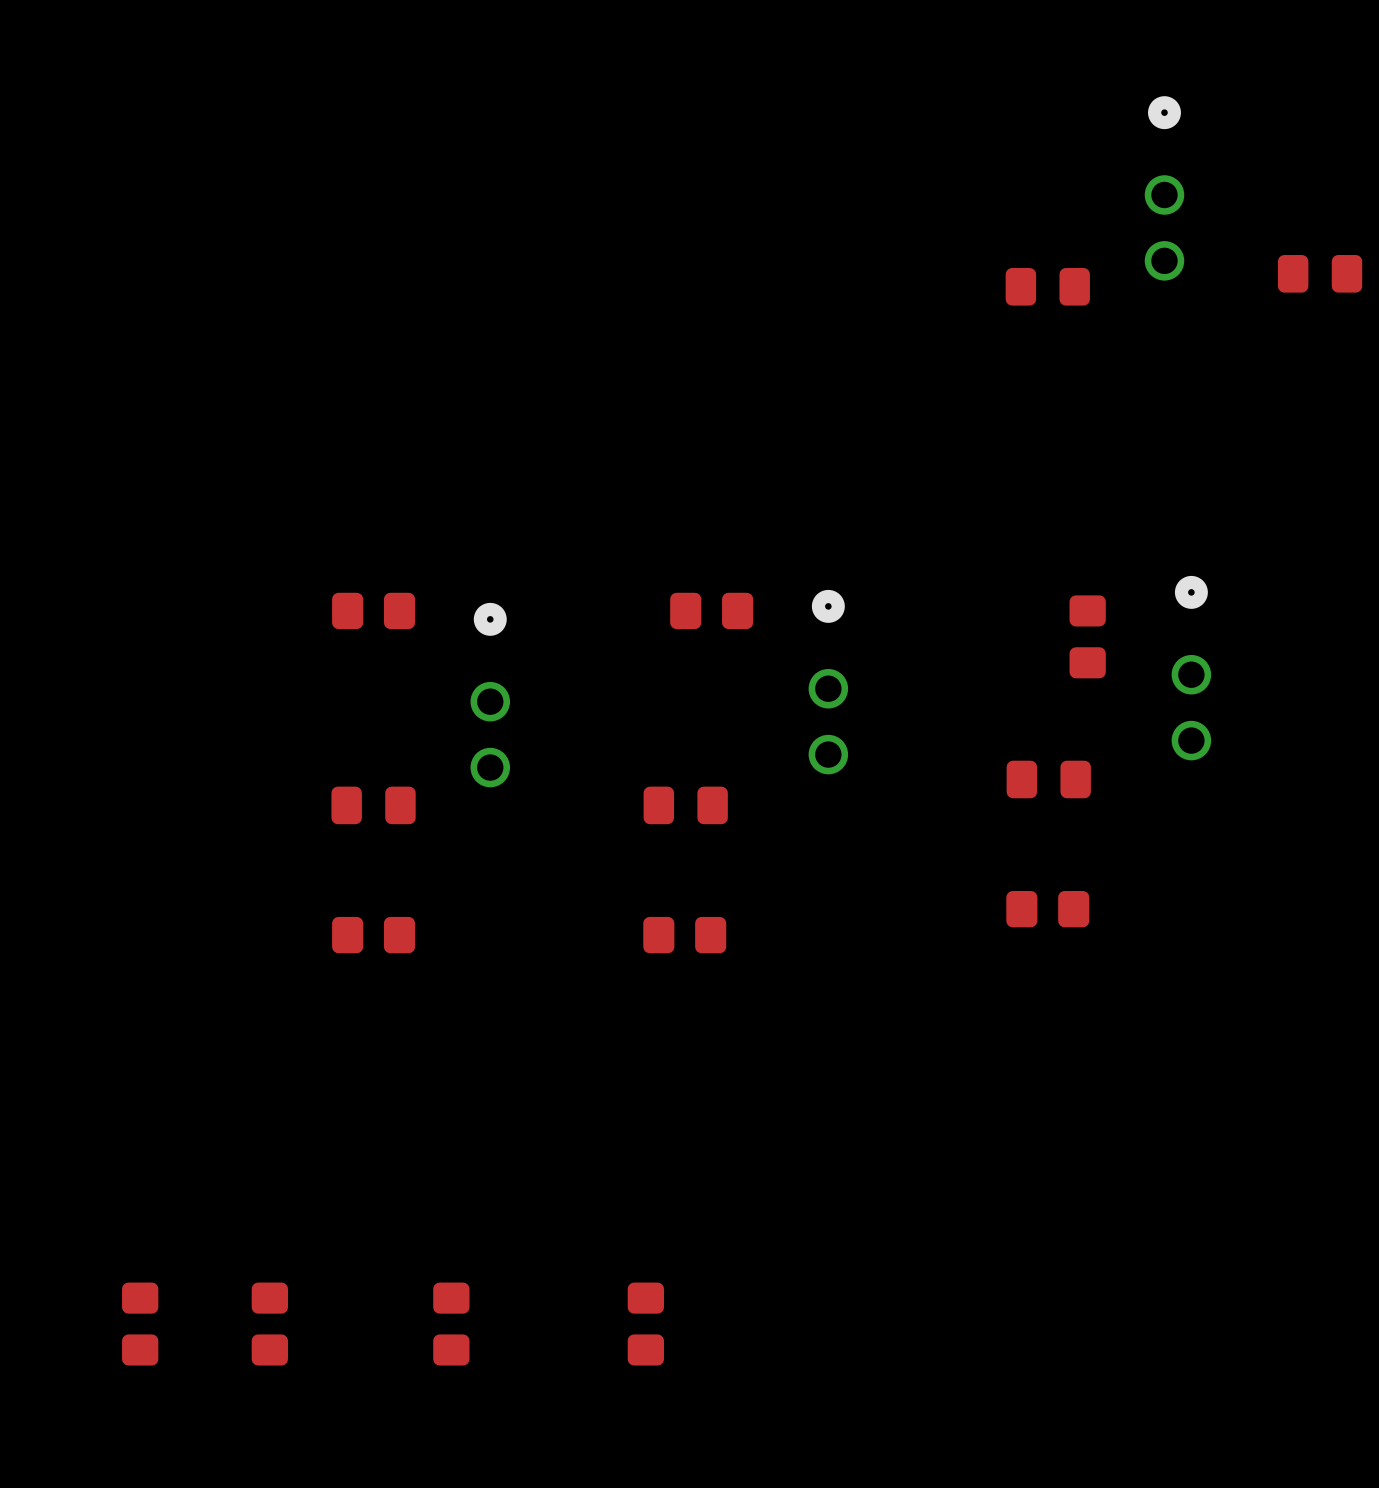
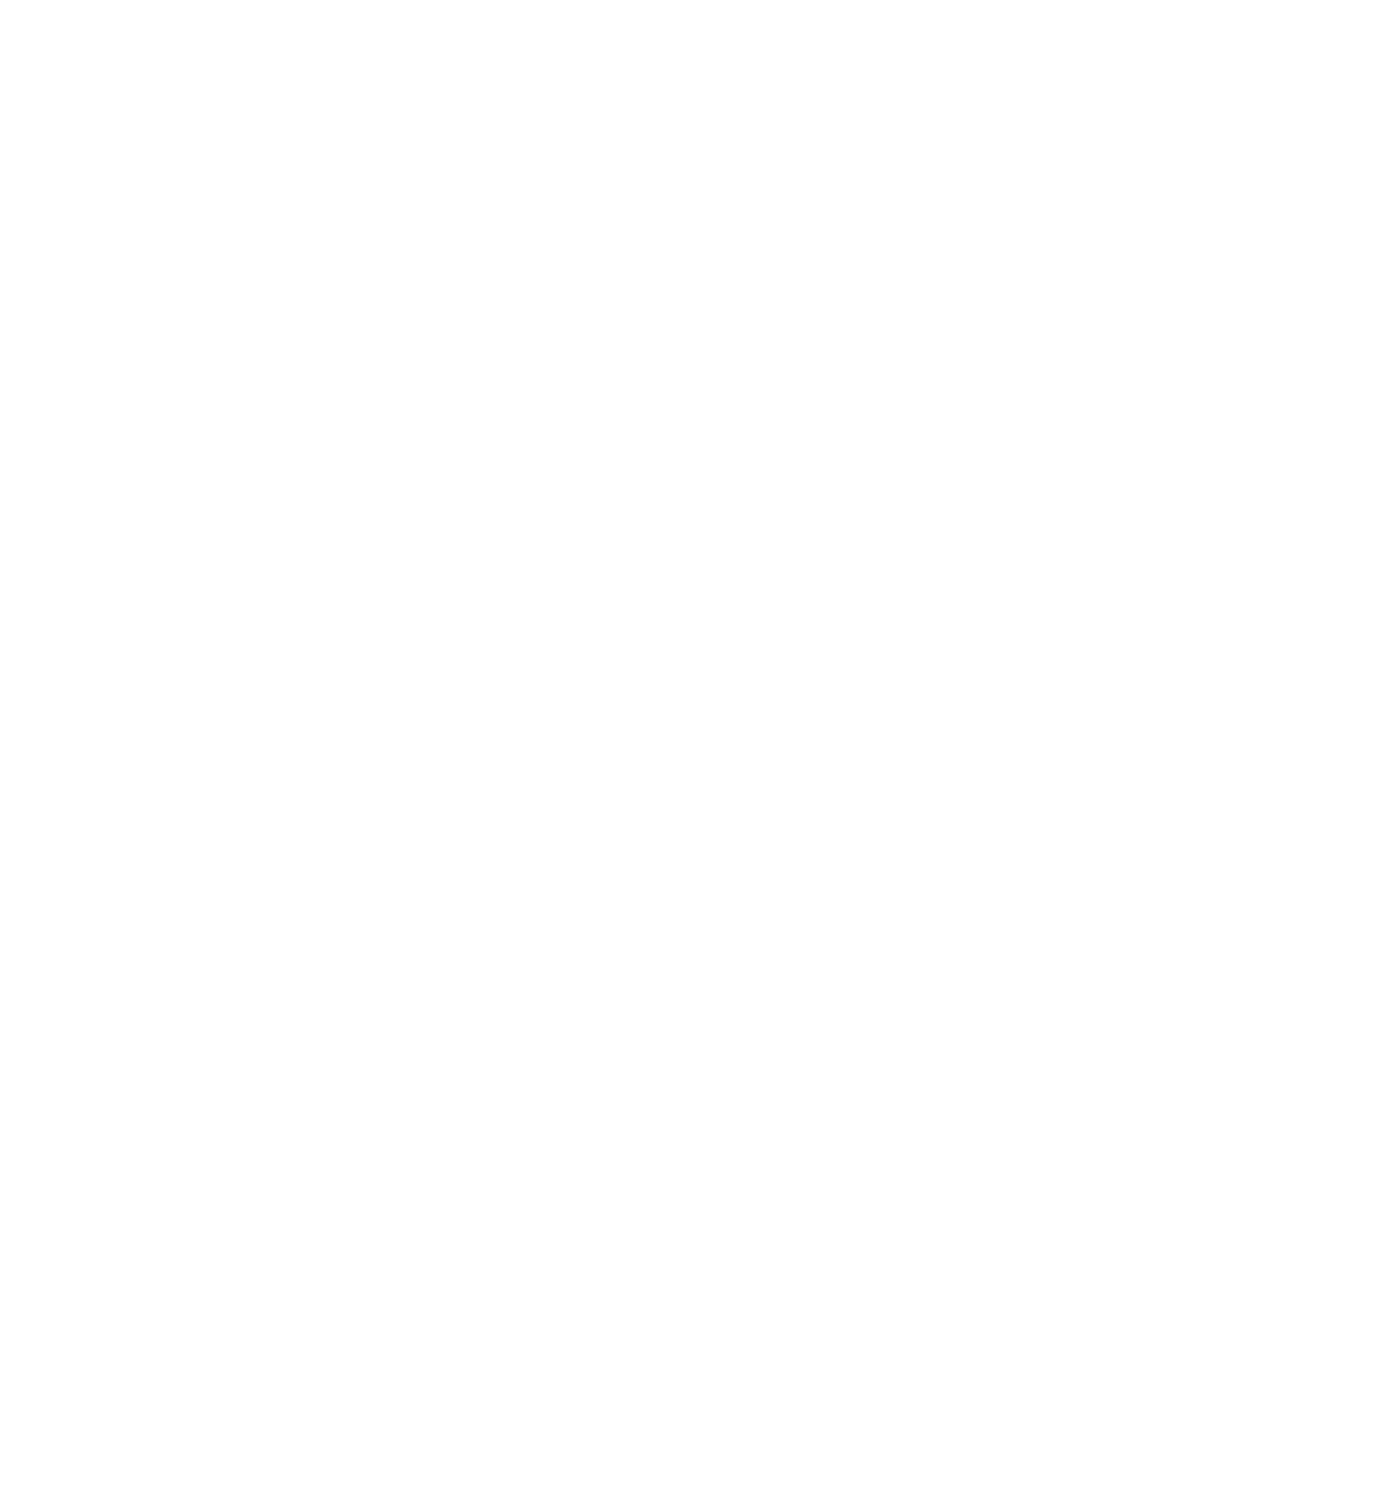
part: (1164, 188) -> none
part: (1320, 273) -> none
part: (1047, 286) -> none
part: (373, 610) -> none
part: (711, 610) -> none
part: (1087, 636) -> none
part: (1191, 668) -> none
part: (828, 682) -> none
part: (490, 695) -> none
part: (1048, 779) -> none
part: (373, 805) -> none
part: (685, 805) -> none
part: (1047, 909) -> none
part: (373, 935) -> none
part: (684, 935) -> none
part: (140, 1324) -> none
part: (269, 1324) -> none
part: (451, 1324) -> none
part: (645, 1324) -> none

